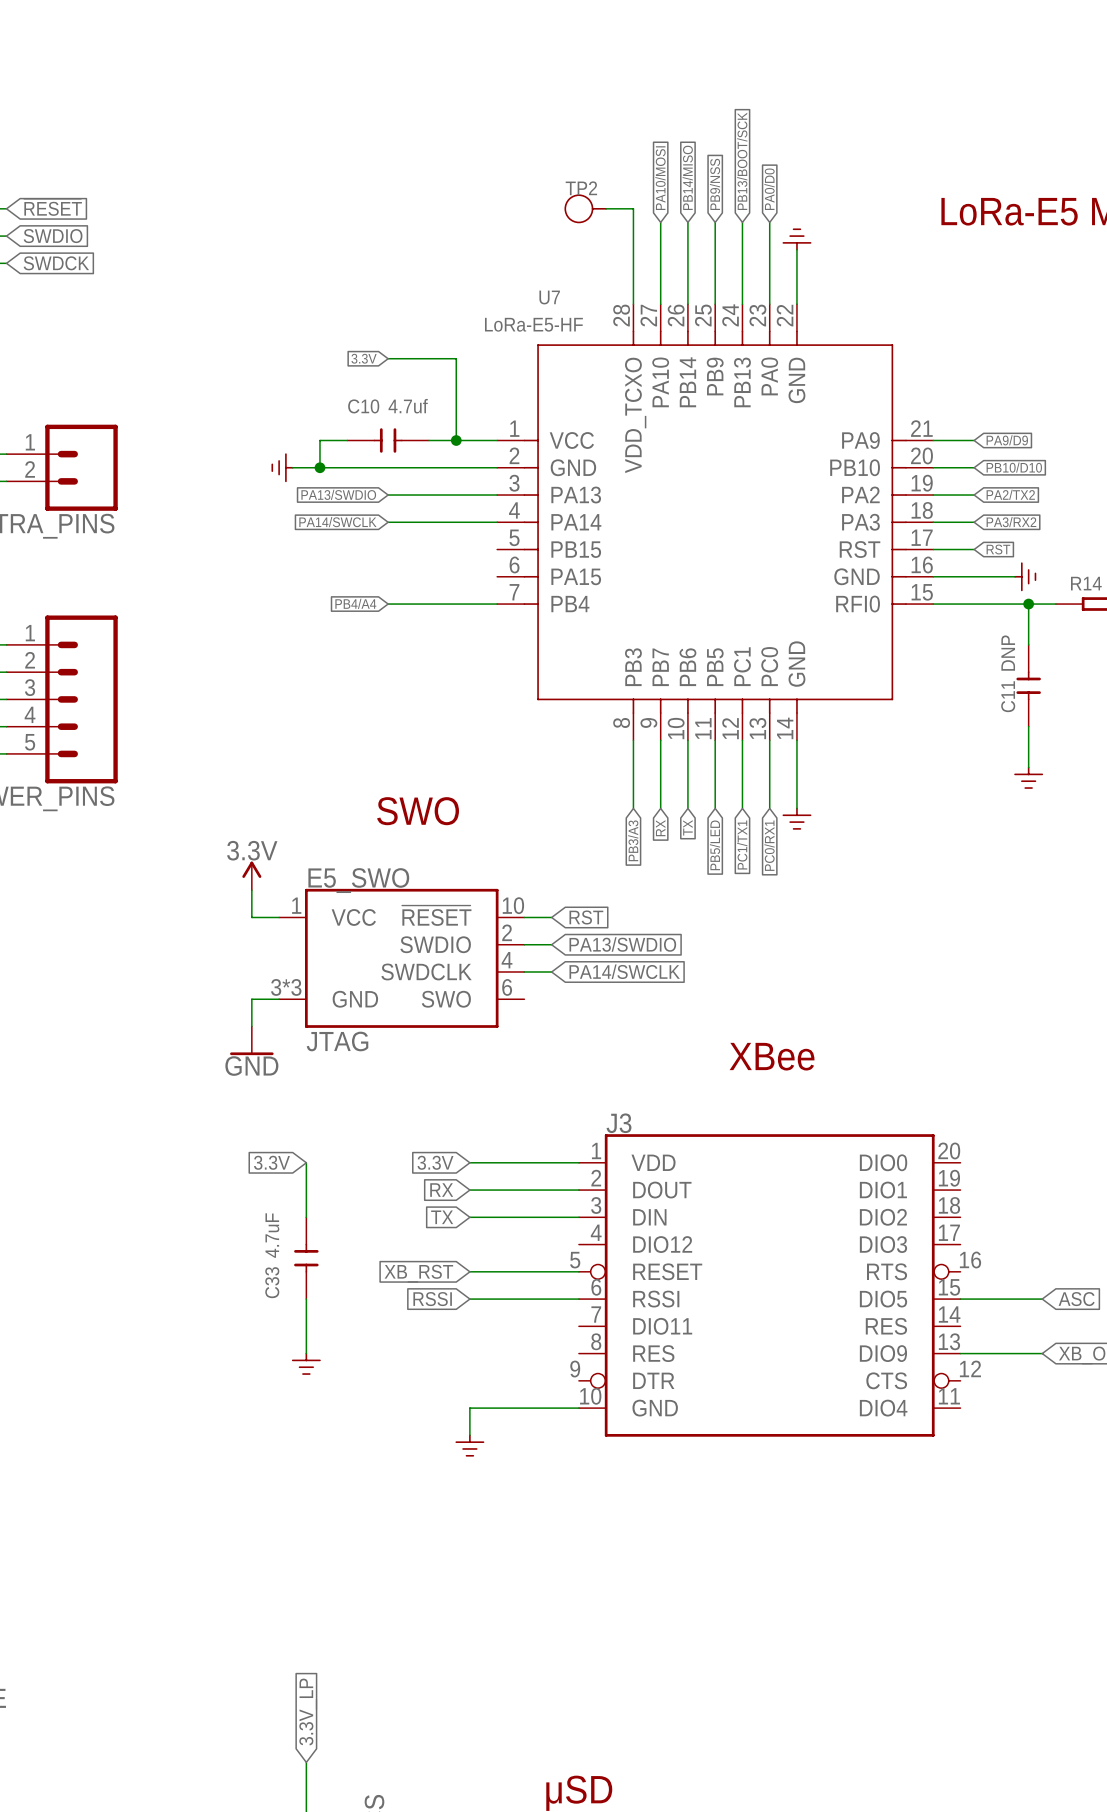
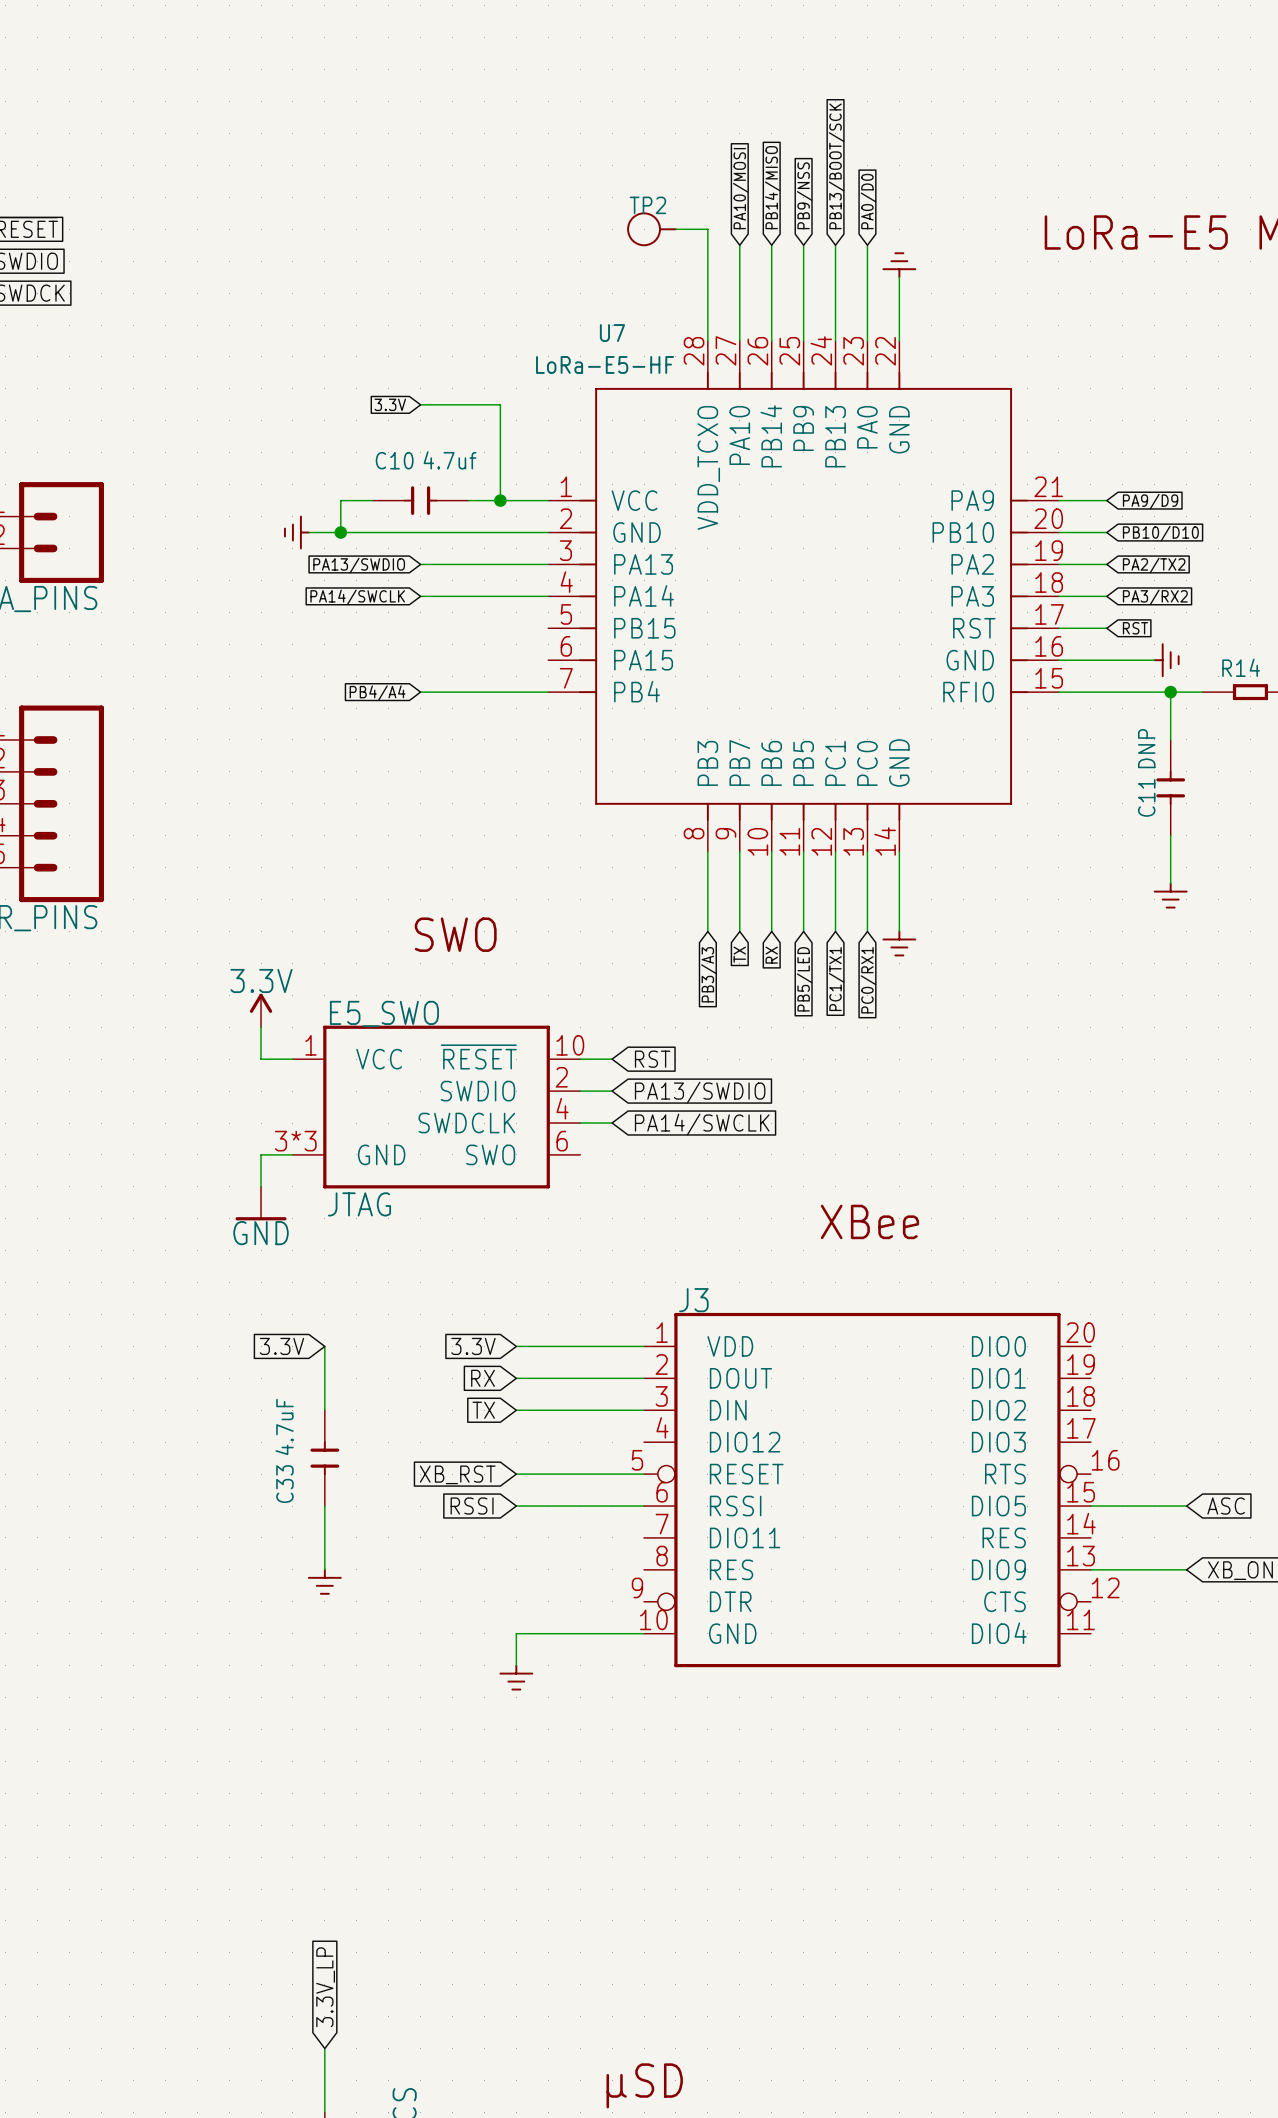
global label: TX (687, 827) -> RX (771, 955)
global label: RX (660, 828) -> TX (739, 954)

